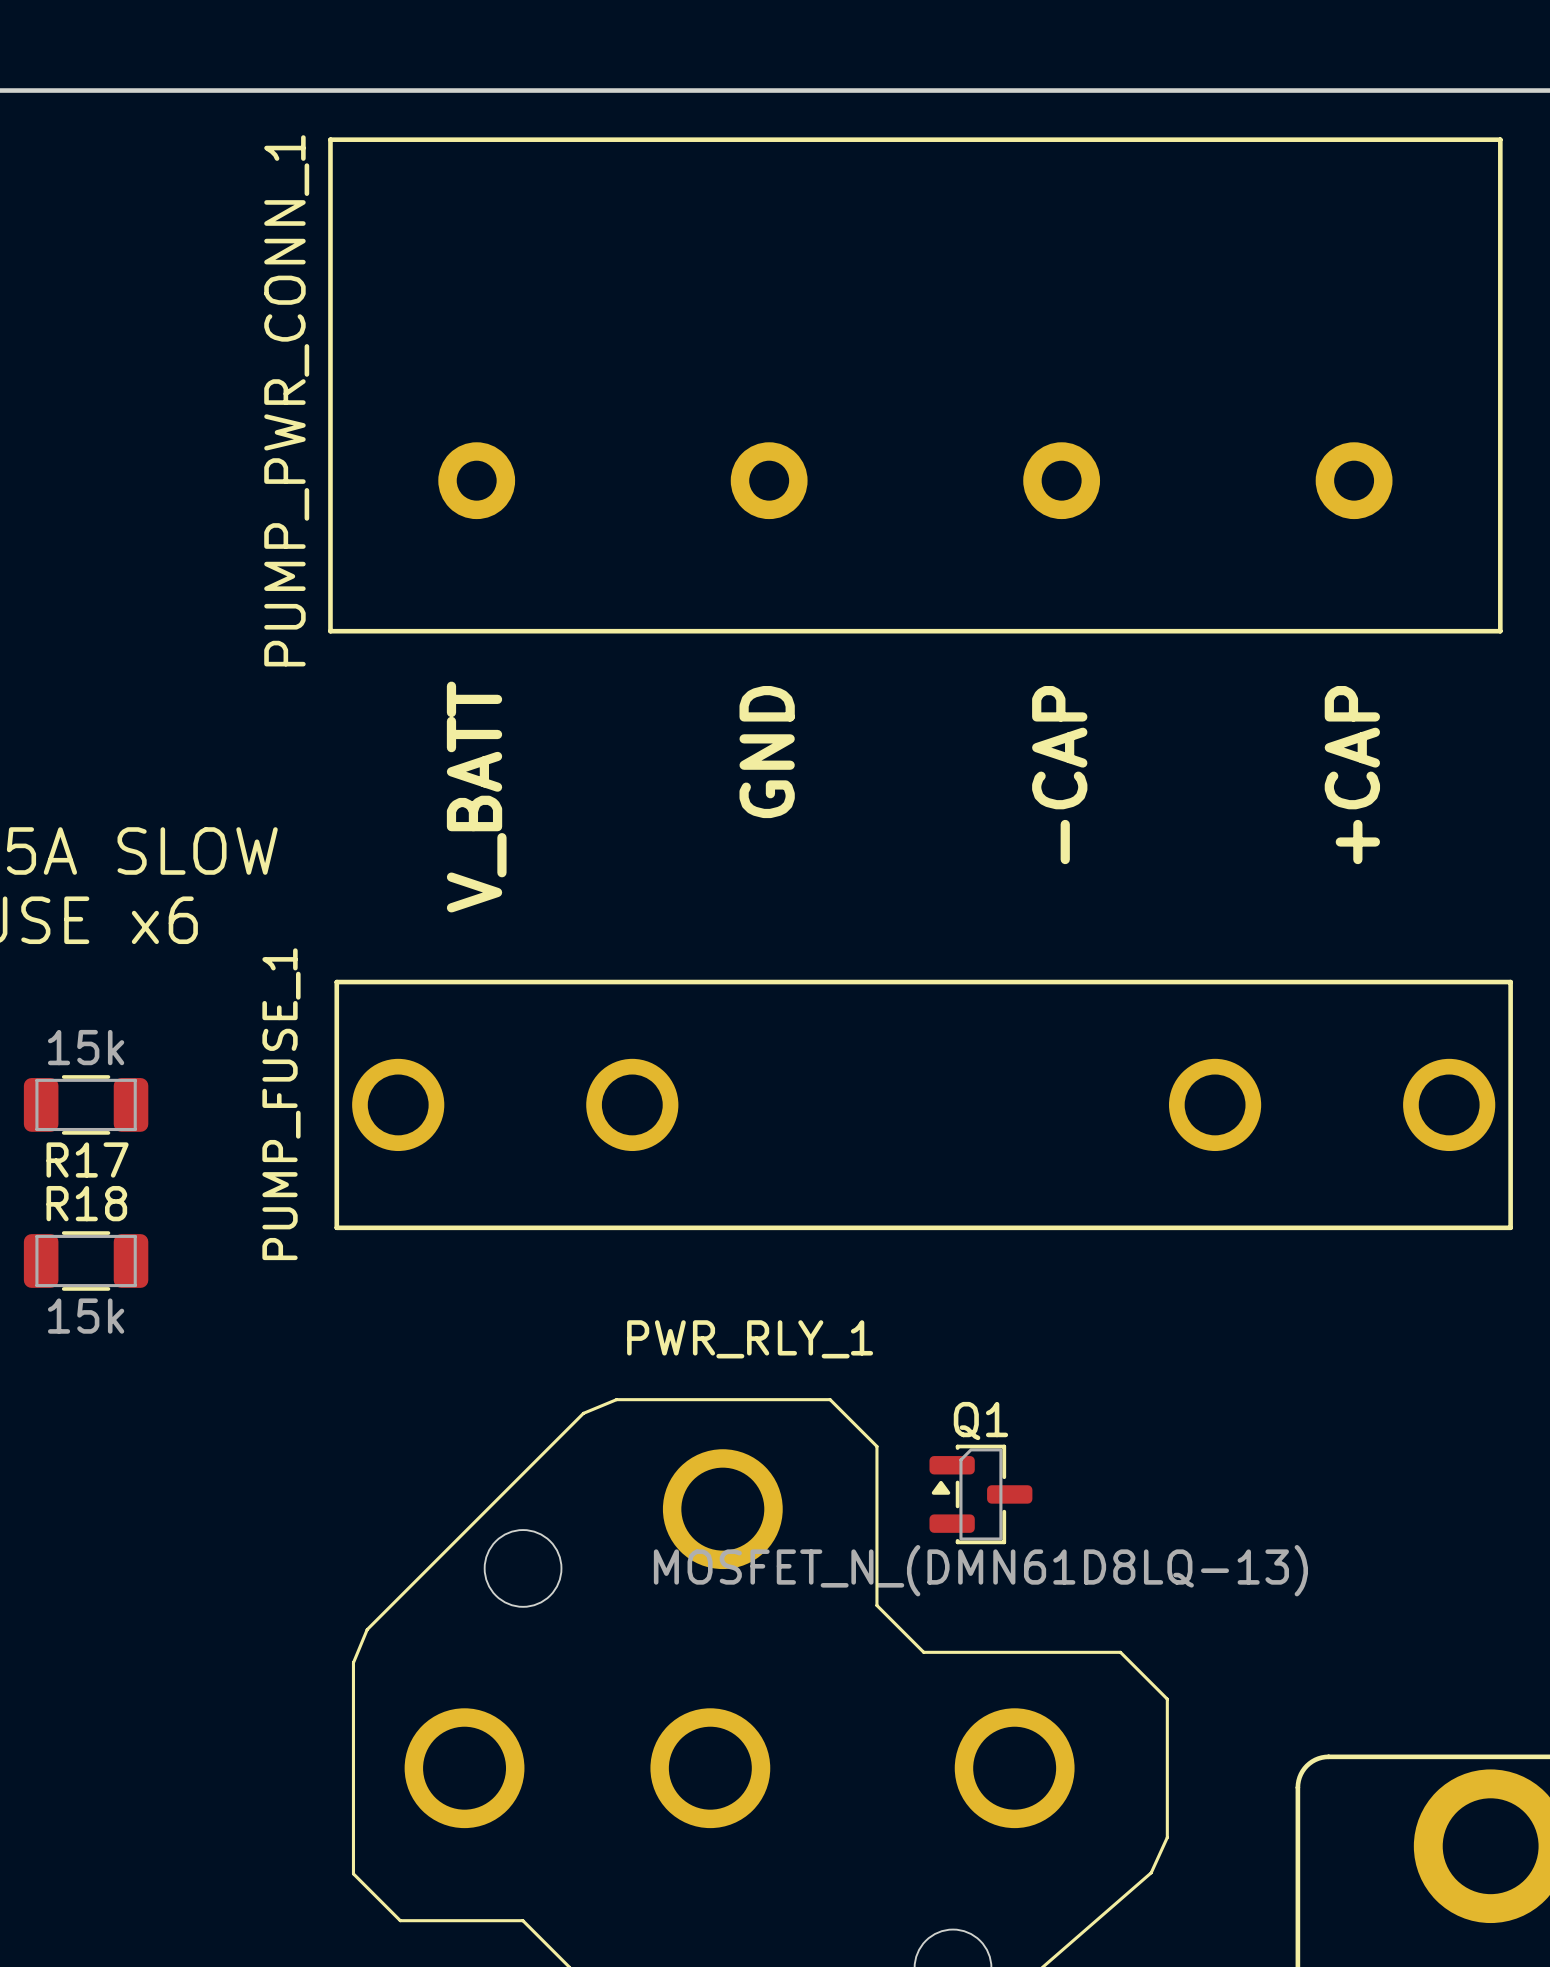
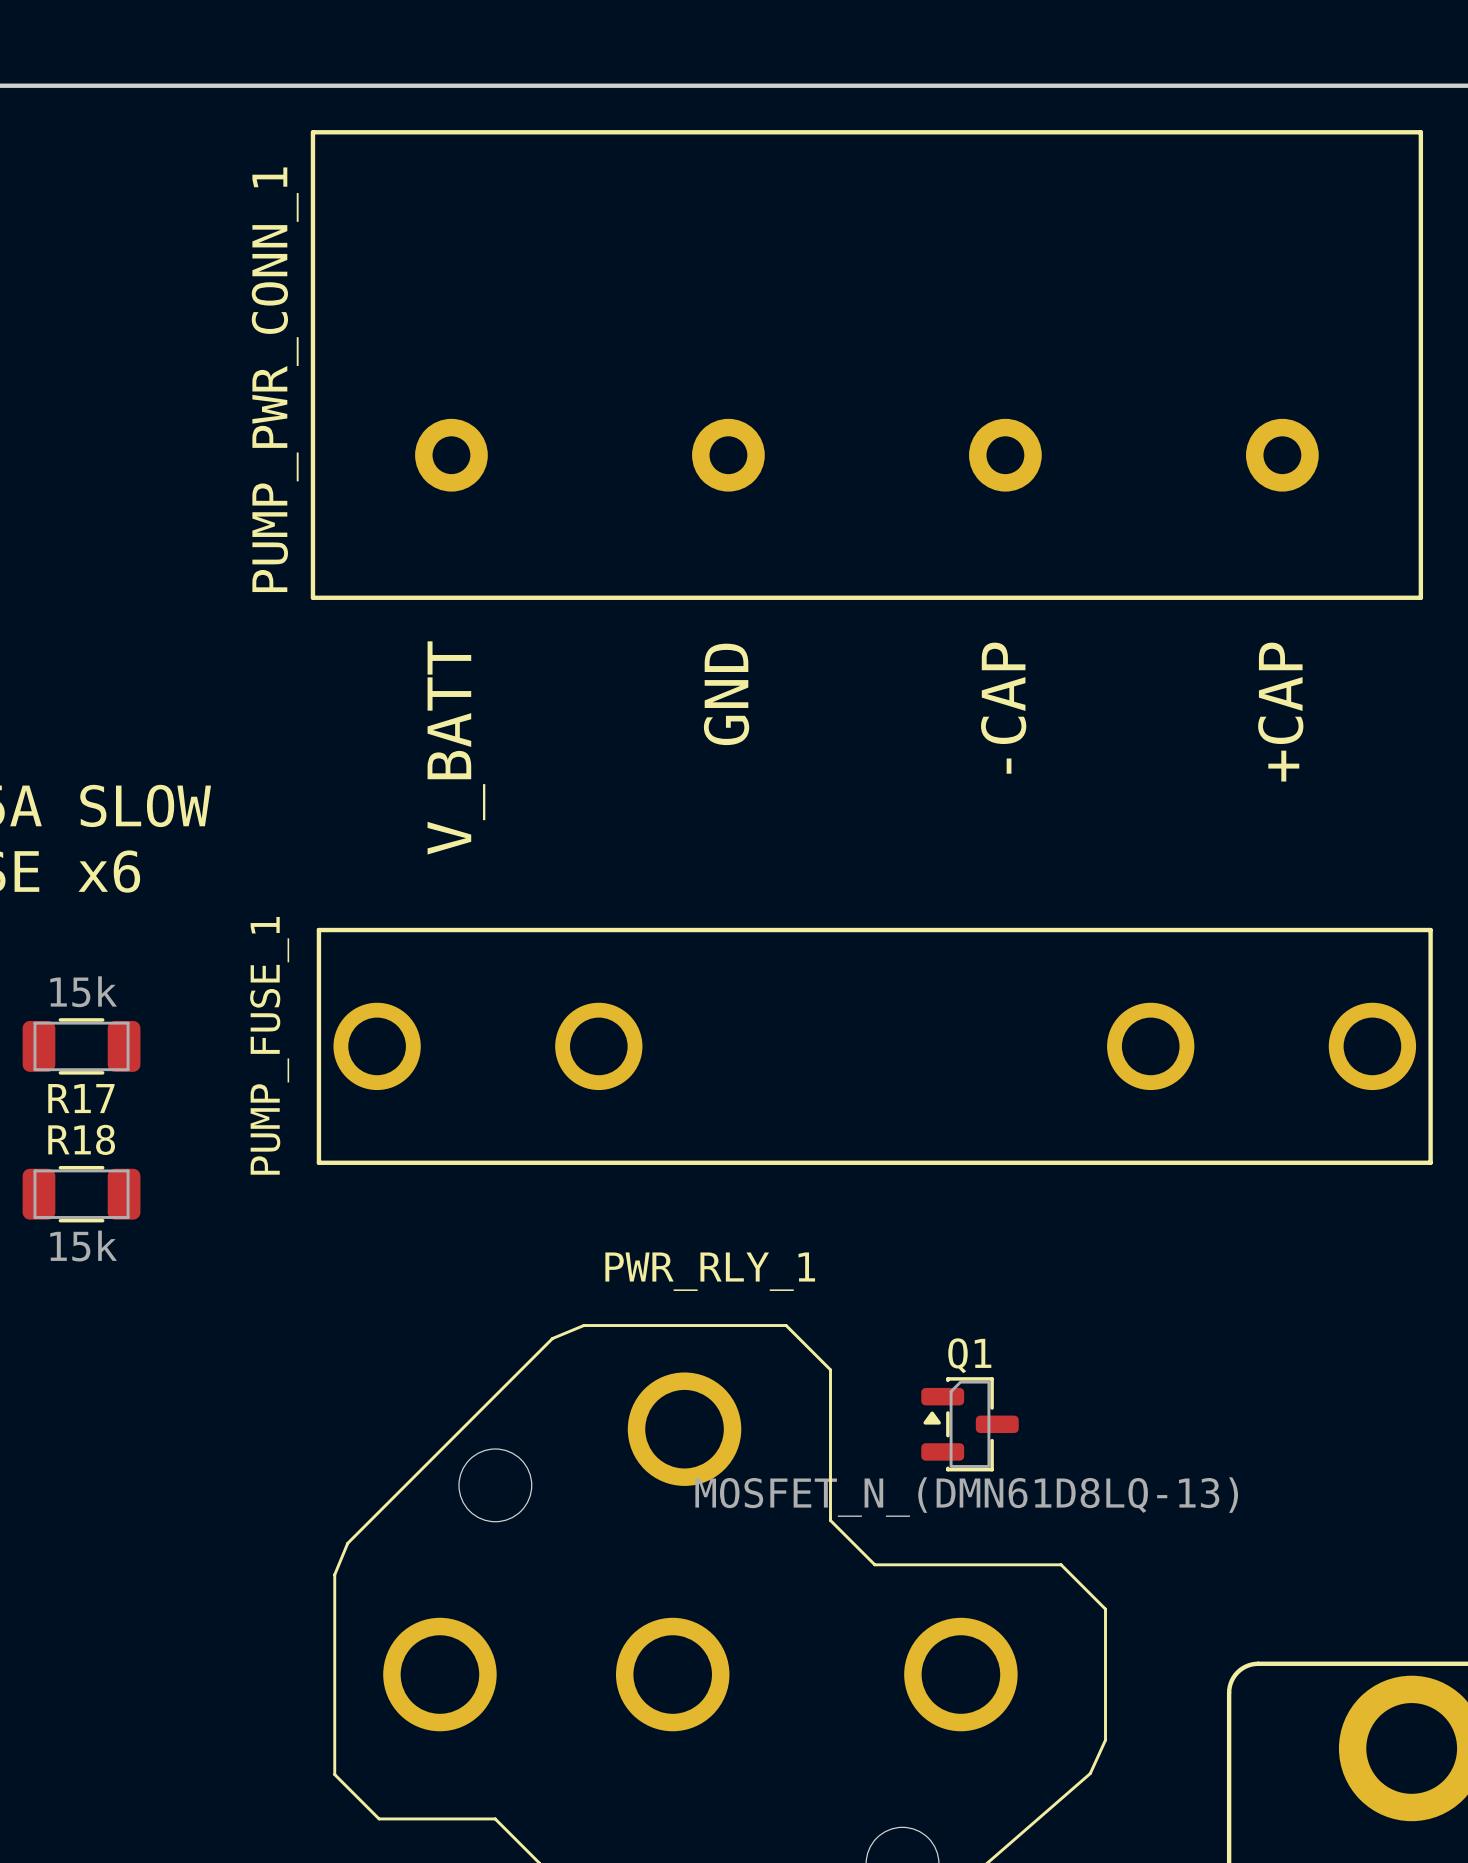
Q1 position: (980, 1494) -> (970, 1424)

